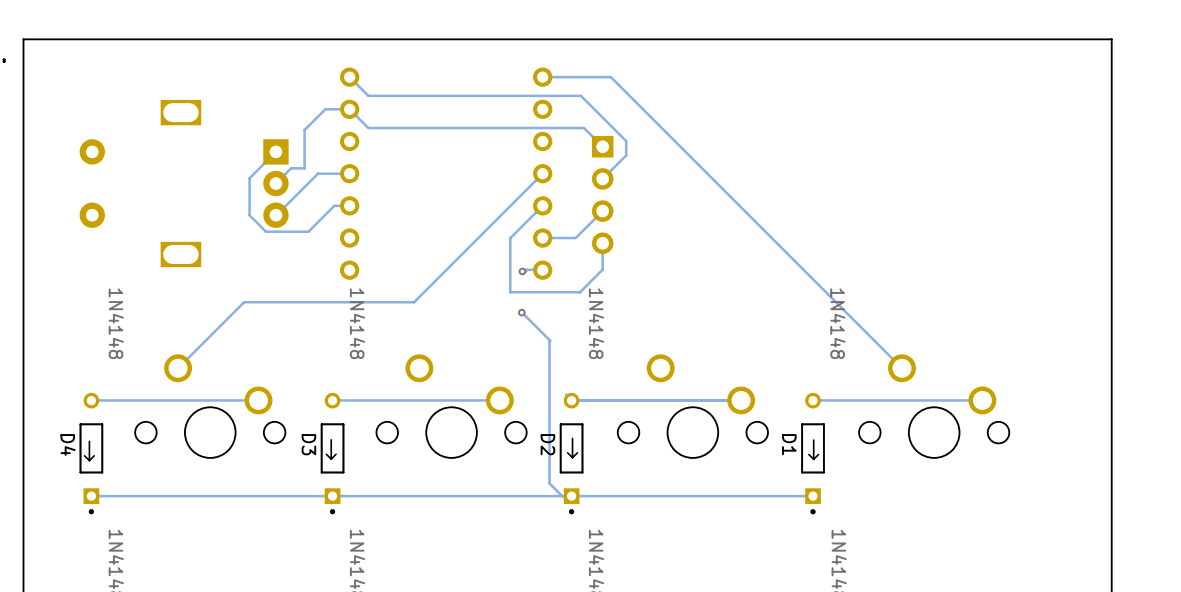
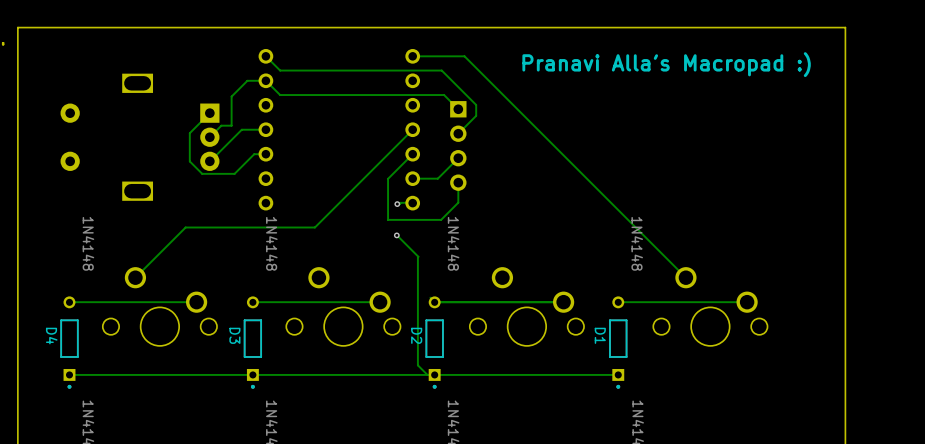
text: none -> Pranavi Alla's Macropad :) (666, 64)
text: ↓ (572, 448) -> none
text: ↓ (331, 449) -> none
text: ↓ (813, 449) -> none
text: ↓ (89, 450) -> none

